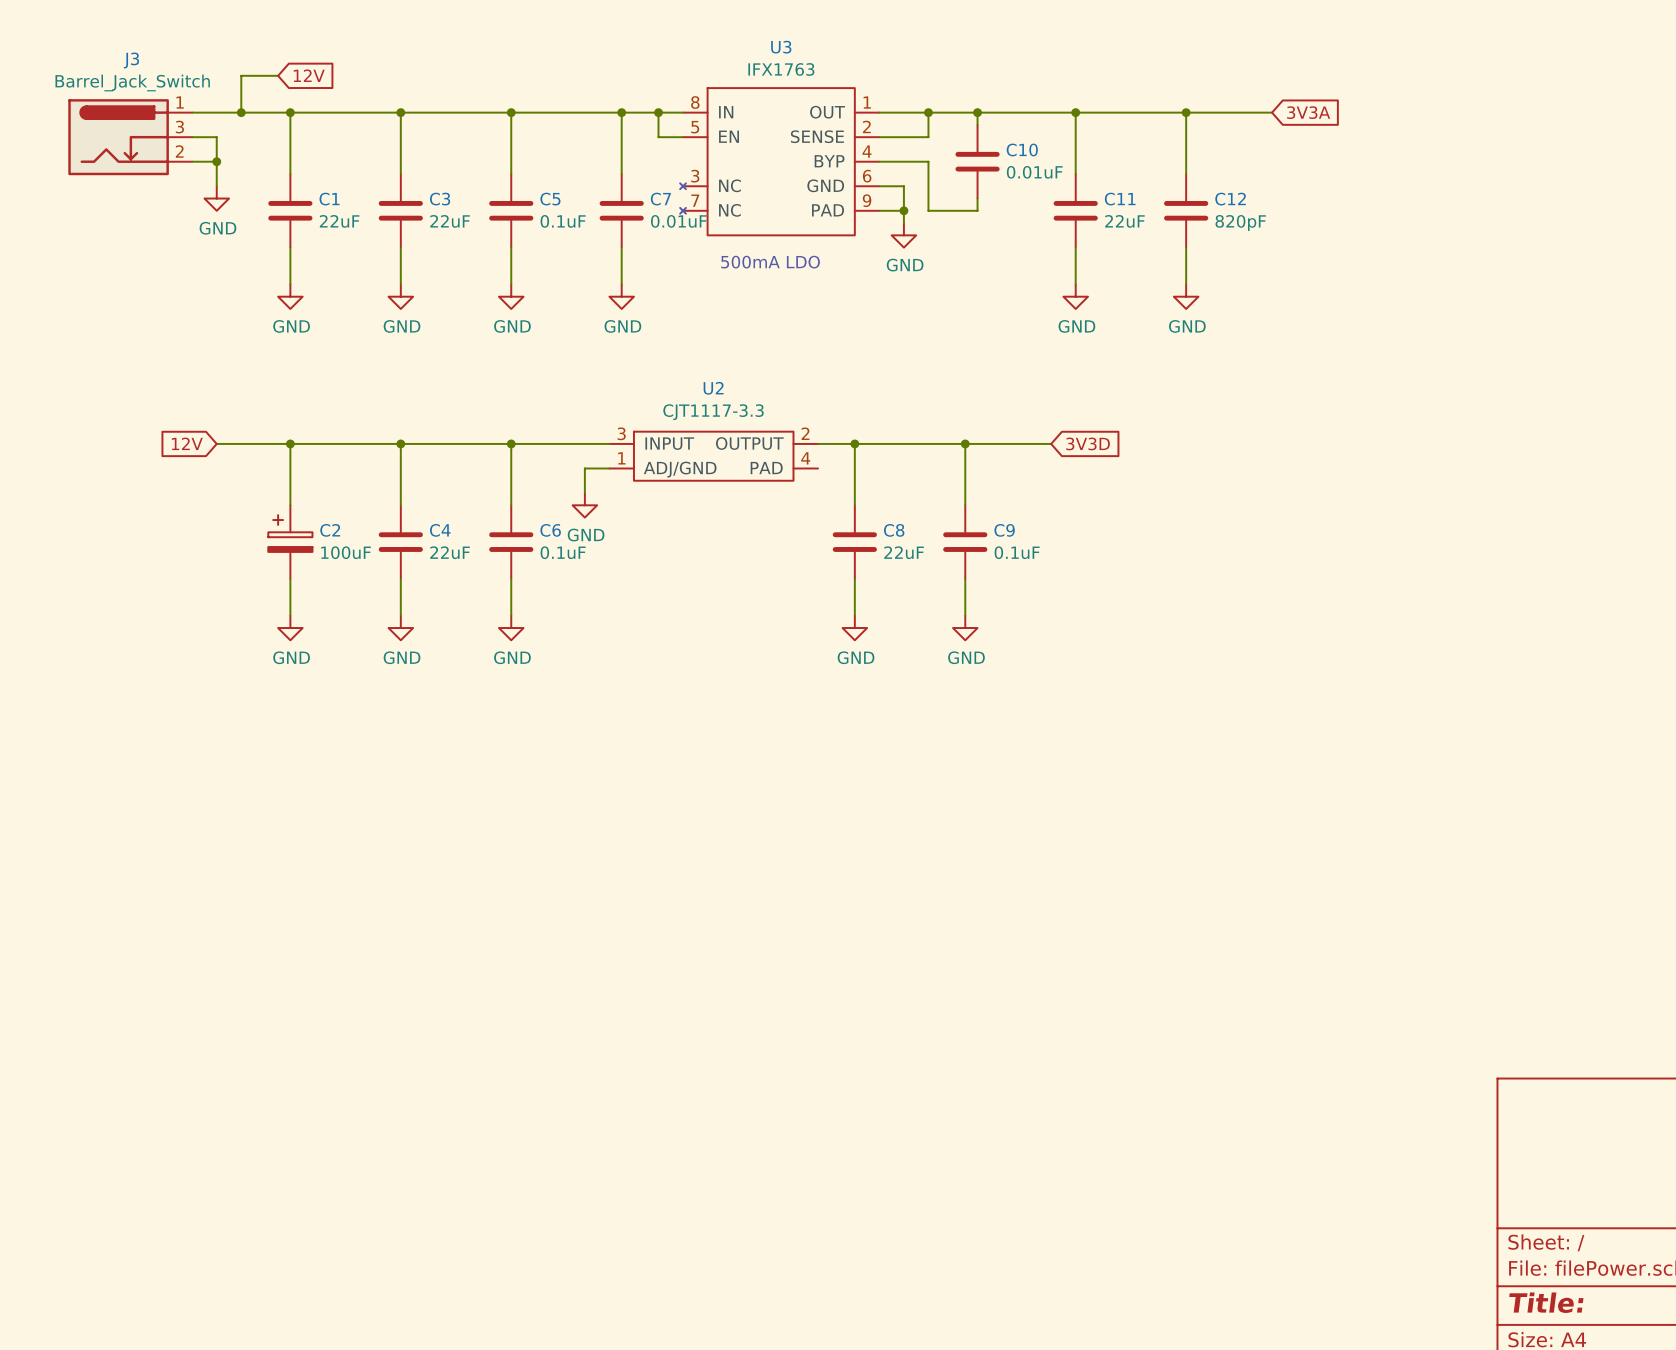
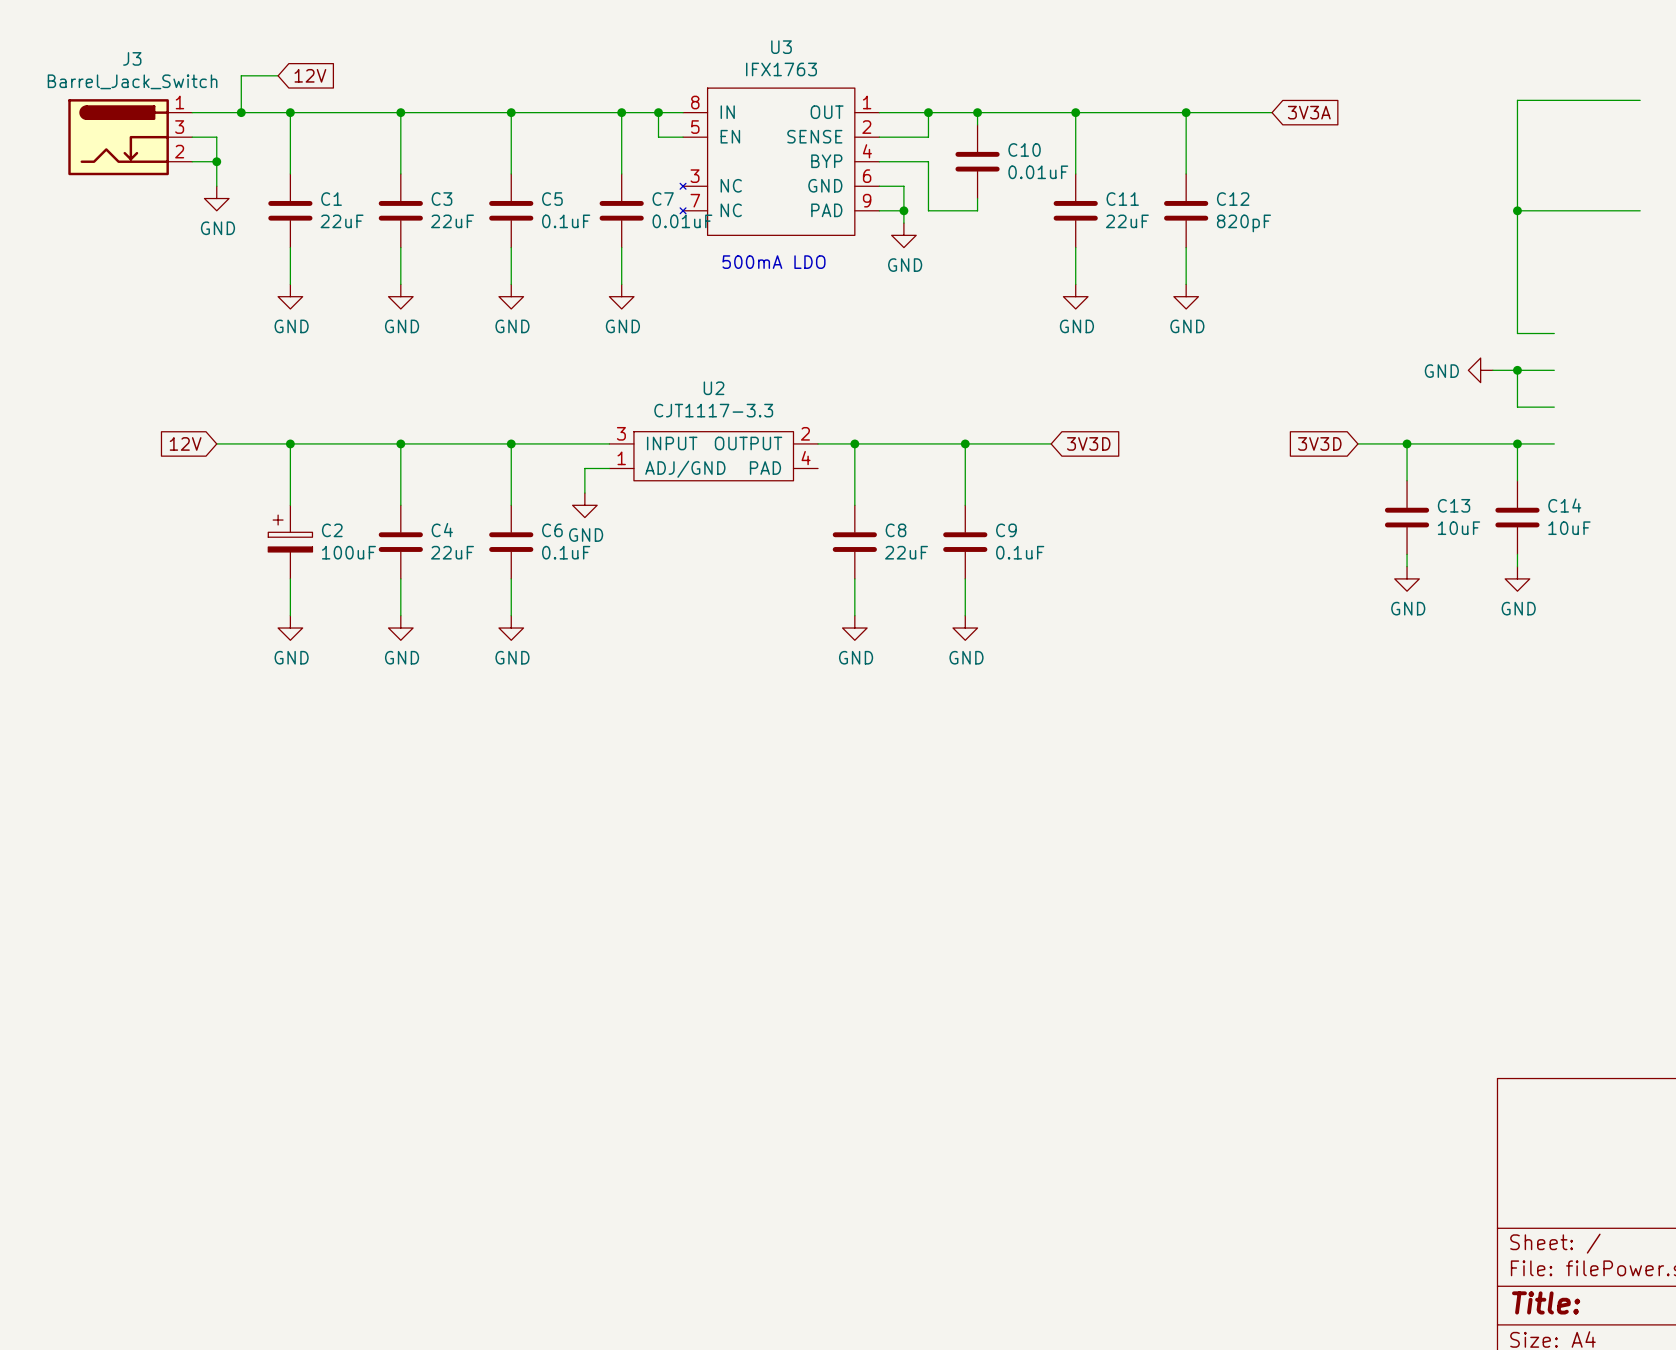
wire: none -> (1640, 100) (1517, 100) (1517, 333) (1554, 333)
wire: none -> (1517, 210) (1640, 210)
junction: none -> (1517, 210)
power symbol: none -> GND (1480, 370)
wire: none -> (1492, 370) (1554, 370)
wire: none -> (1517, 370) (1517, 407) (1554, 407)
junction: none -> (1517, 370)
global label: none -> 3V3D (1319, 443)
wire: none -> (1357, 443) (1554, 443)
wire: none -> (1407, 443) (1407, 480)
junction: none -> (1407, 443)
wire: none -> (1517, 443) (1517, 480)
junction: none -> (1517, 443)
C13: none -> 10uF (1407, 517)
C14: none -> 10uF (1517, 517)
wire: none -> (1407, 554) (1407, 566)
wire: none -> (1517, 554) (1517, 566)
power symbol: none -> GND (1407, 578)
power symbol: none -> GND (1517, 578)

